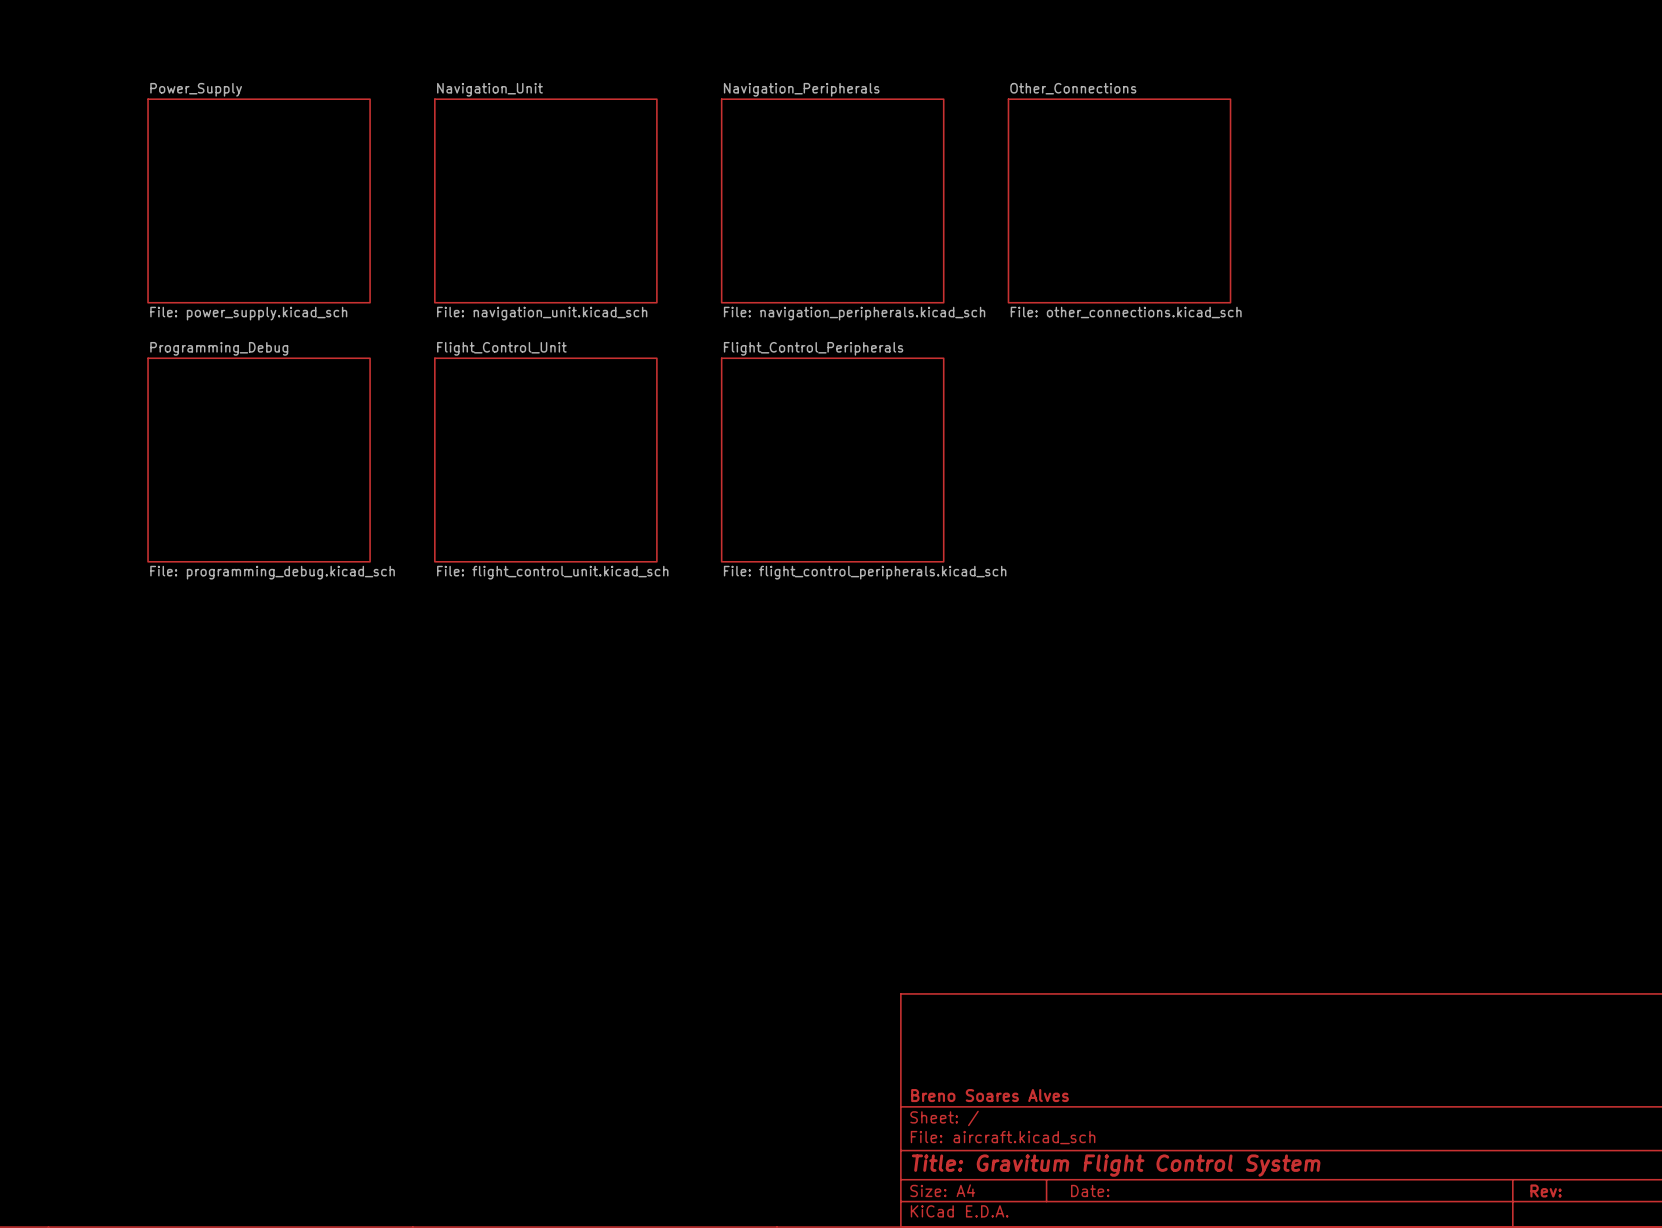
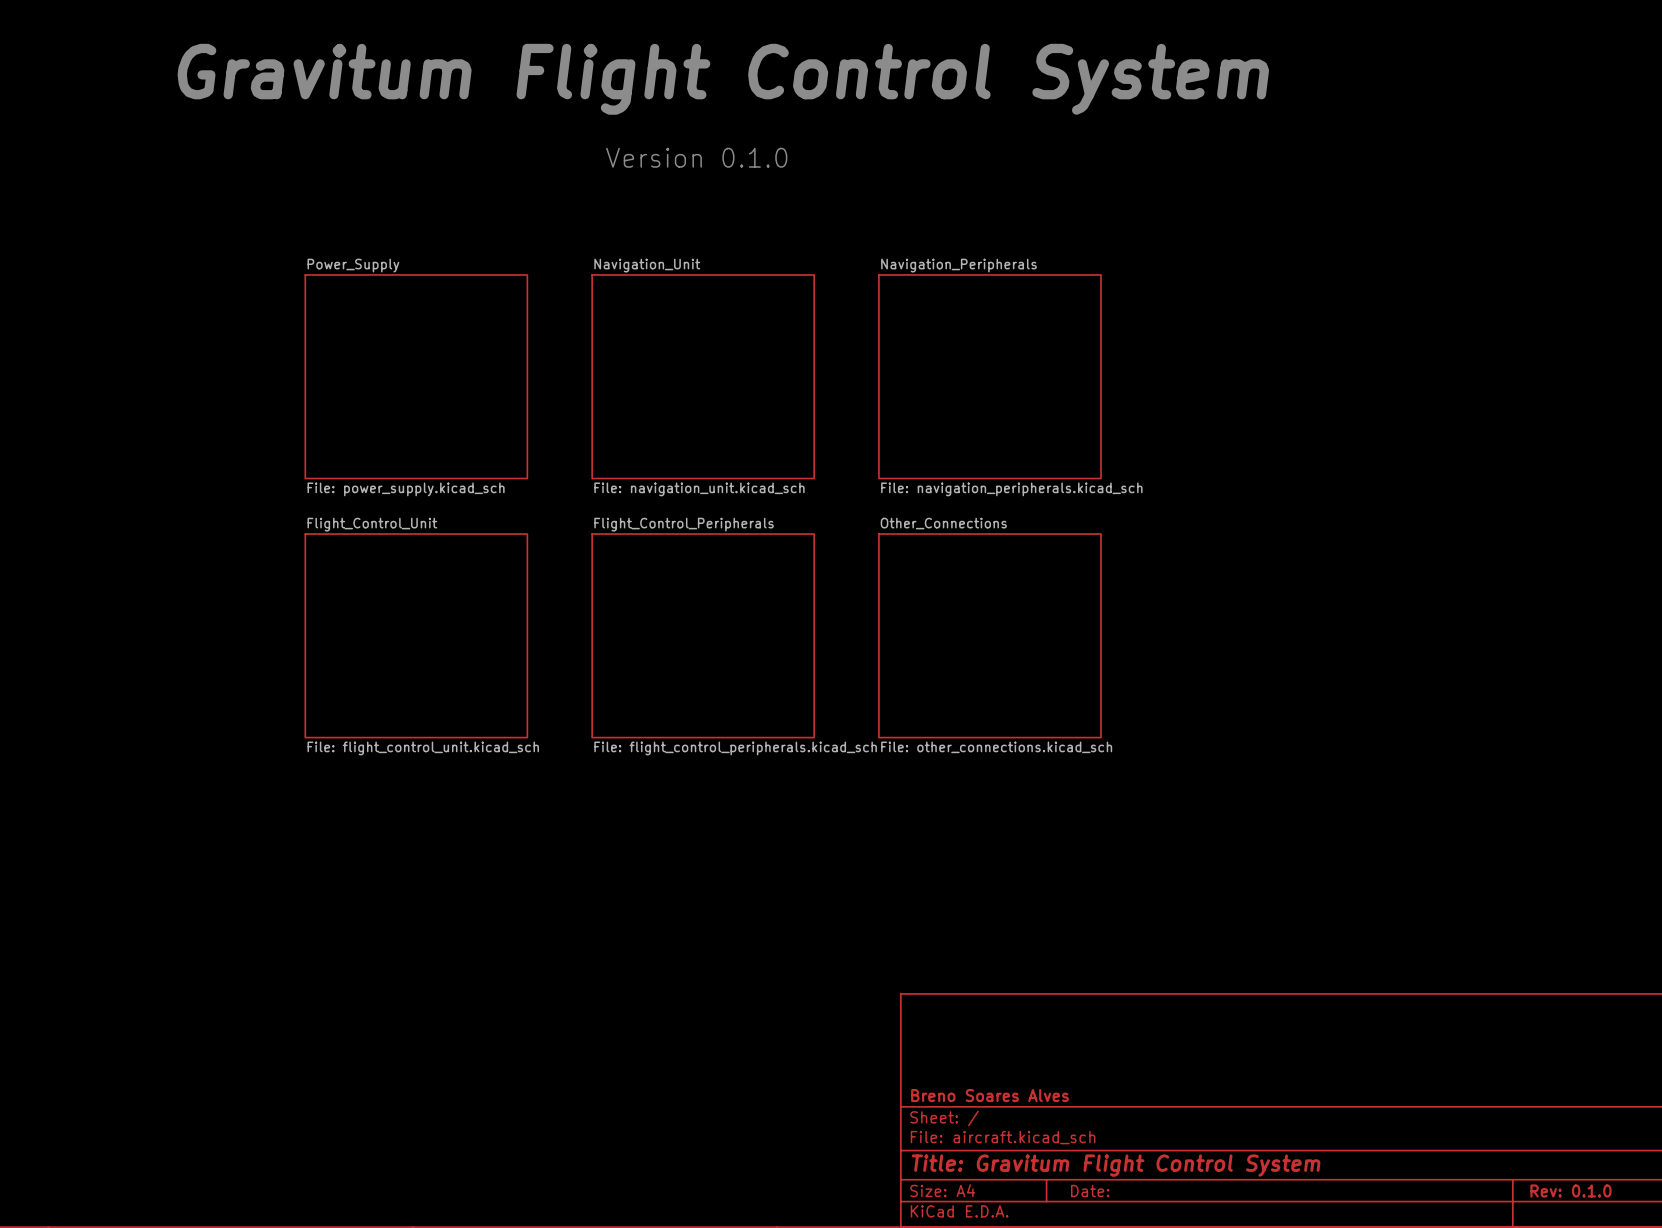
text: none -> Gravitum Flight Control System (723, 79)
text: none -> Version 0.1.0 (696, 157)
sheet Power_Supply: File: power_supply.kicad_sch (259, 200) -> none
sheet Navigation_Unit: File: navigation_unit.kicad_sch (545, 200) -> none
sheet Navigation_Peripherals: File: navigation_peripherals.kicad_sch (832, 200) -> none
sheet Other_Connections: File: other_connections.kicad_sch (1119, 200) -> none
sheet Power_Supply: none -> File: power_supply.kicad_sch (416, 376)
sheet Navigation_Unit: none -> File: navigation_unit.kicad_sch (703, 376)
sheet Navigation_Peripherals: none -> File: navigation_peripherals.kicad_sch (989, 376)
sheet Programming_Debug: File: programming_debug.kicad_sch (259, 460) -> none
sheet Flight_Control_Unit: File: flight_control_unit.kicad_sch (545, 460) -> none
sheet Flight_Control_Peripherals: File: flight_control_peripherals.kicad_sch (832, 460) -> none
sheet Flight_Control_Unit: none -> File: flight_control_unit.kicad_sch (416, 635)
sheet Flight_Control_Peripherals: none -> File: flight_control_peripherals.kicad_sch (703, 635)
sheet Other_Connections: none -> File: other_connections.kicad_sch (989, 635)
title block: Rev: (1546, 1190) -> Rev: 0.1.0 (1570, 1190)

